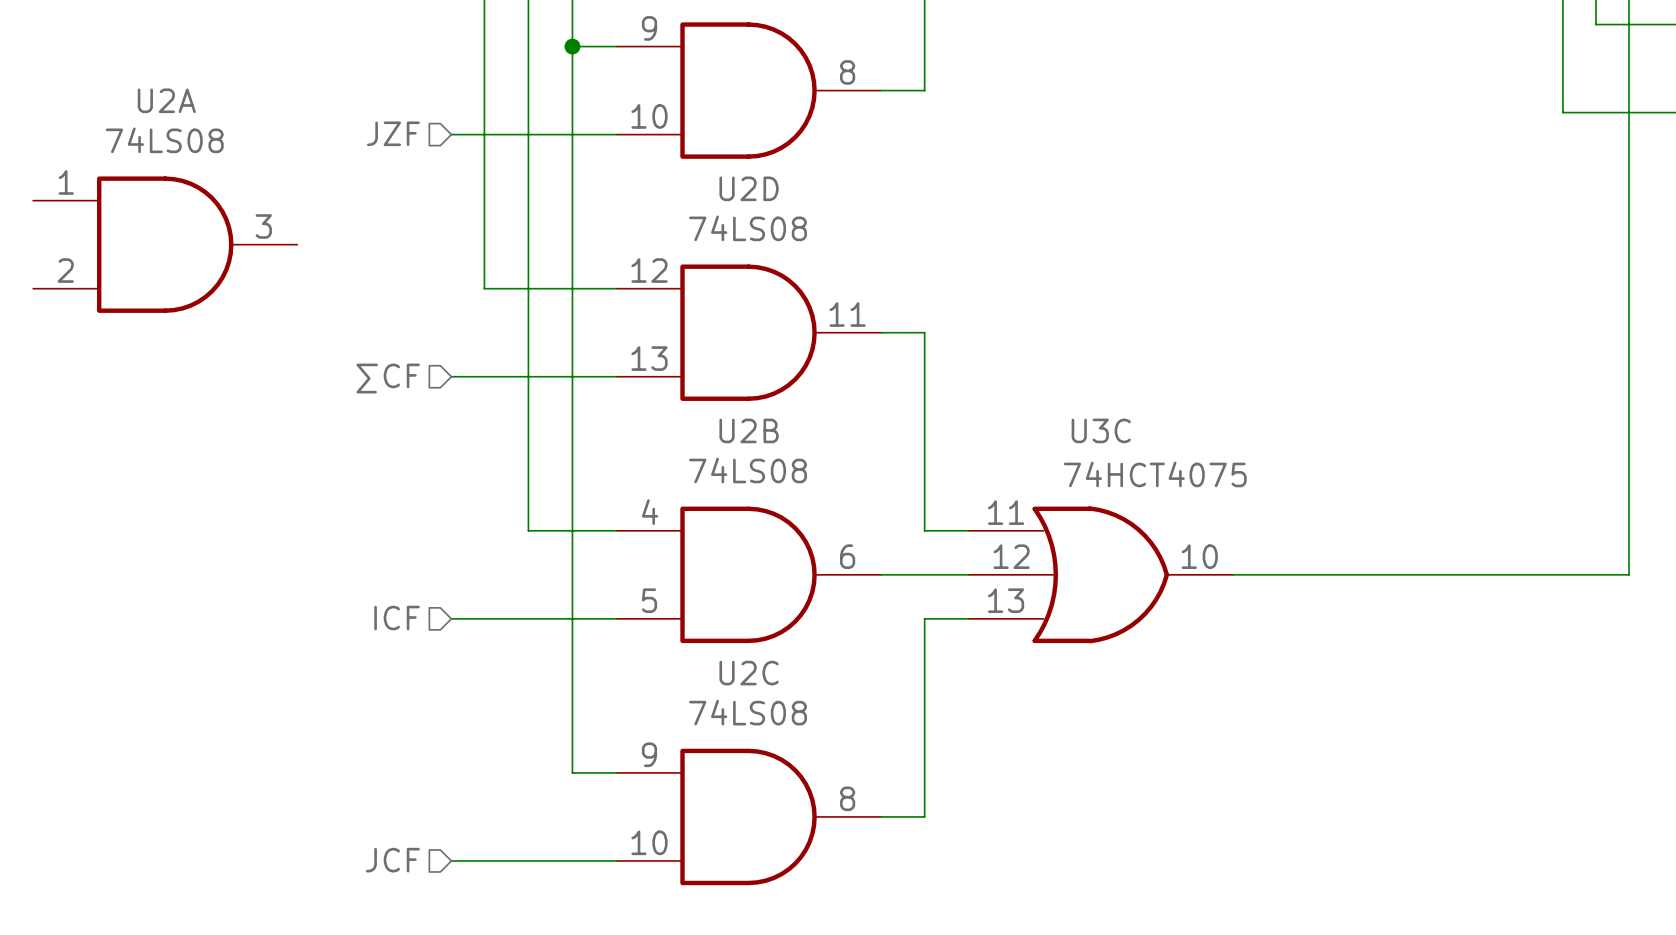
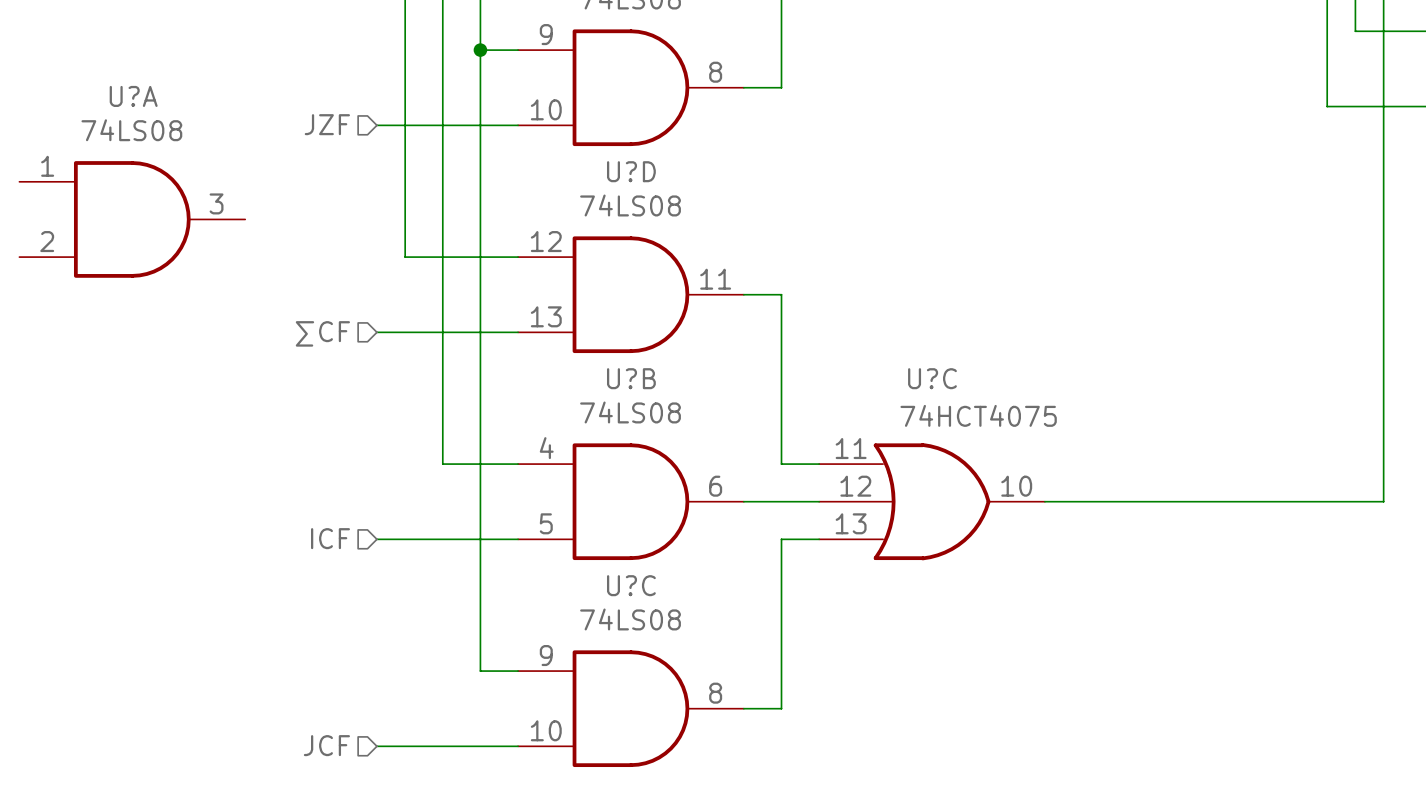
U2A name: U2A (166, 100) -> U?A (133, 96)
U2D name: U2D (749, 188) -> U?D (631, 171)
U2B name: U2B (749, 430) -> U?B (631, 378)
U3C name: U3C (1101, 430) -> U?C (932, 378)
U2C name: U2C (749, 673) -> U?C (631, 585)

